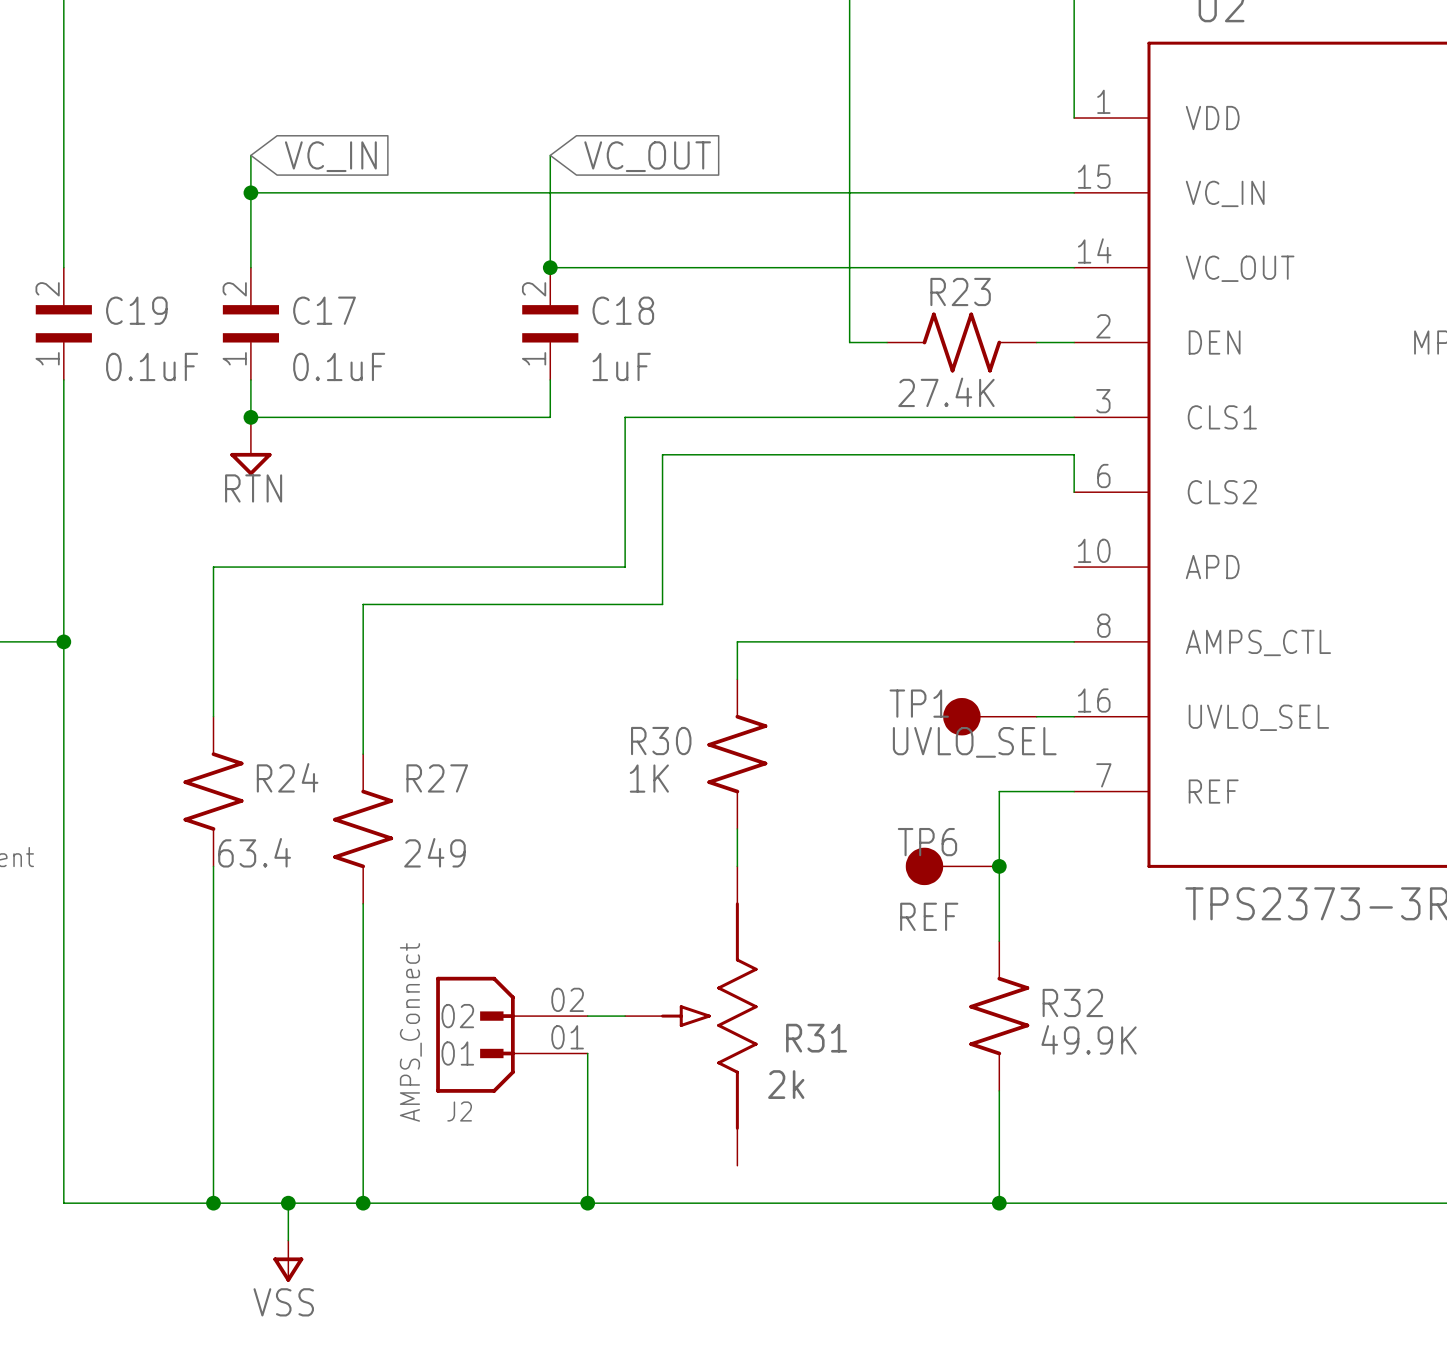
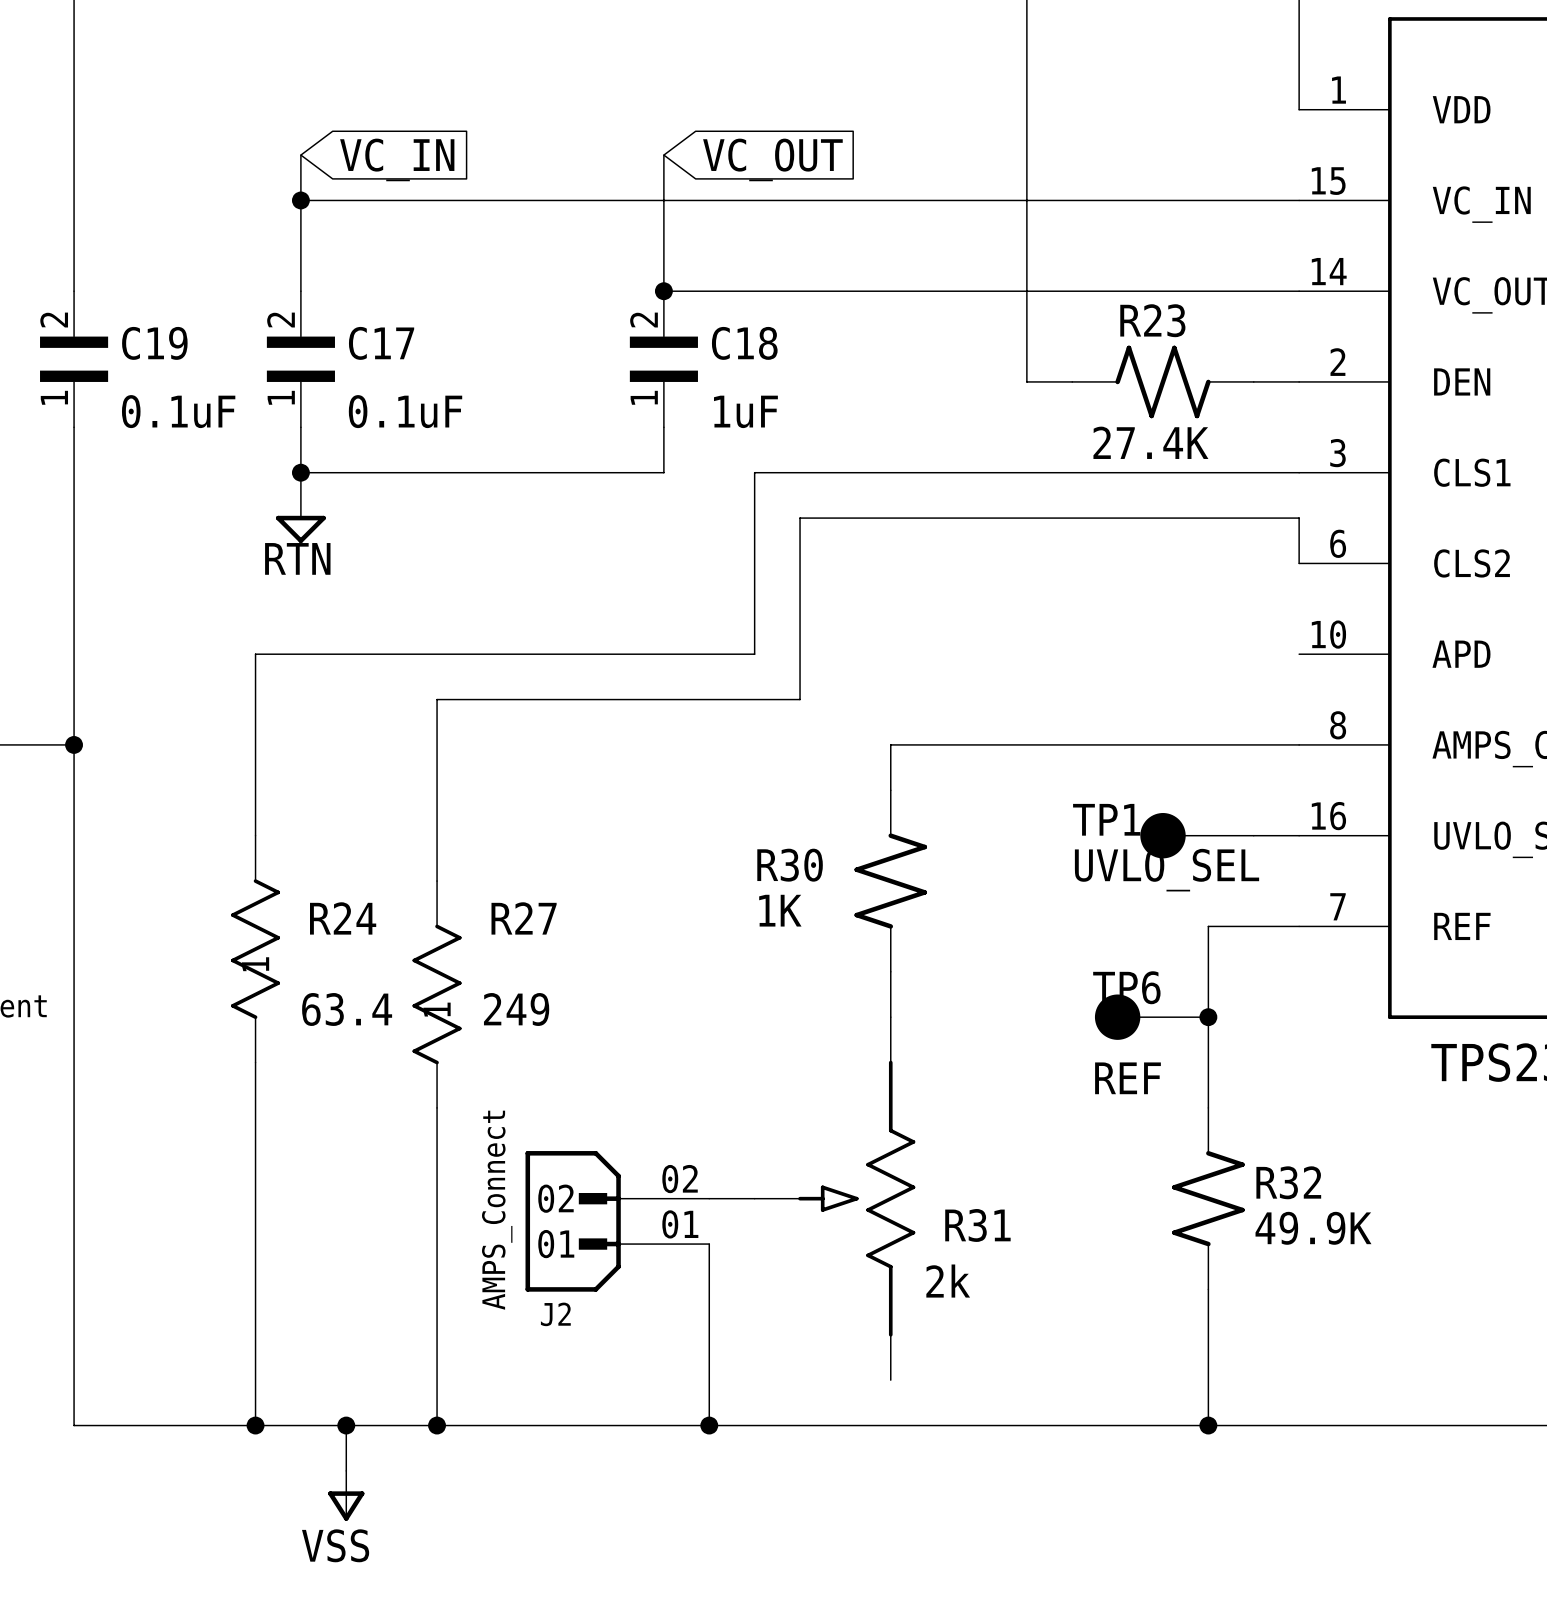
R24 symbol: [183, 716, 244, 867] -> [231, 835, 281, 1063]
R27 symbol: [333, 754, 394, 904] -> [412, 881, 462, 1108]
R24 value position: 63.4 (254, 852) -> 63.4 (347, 1009)

